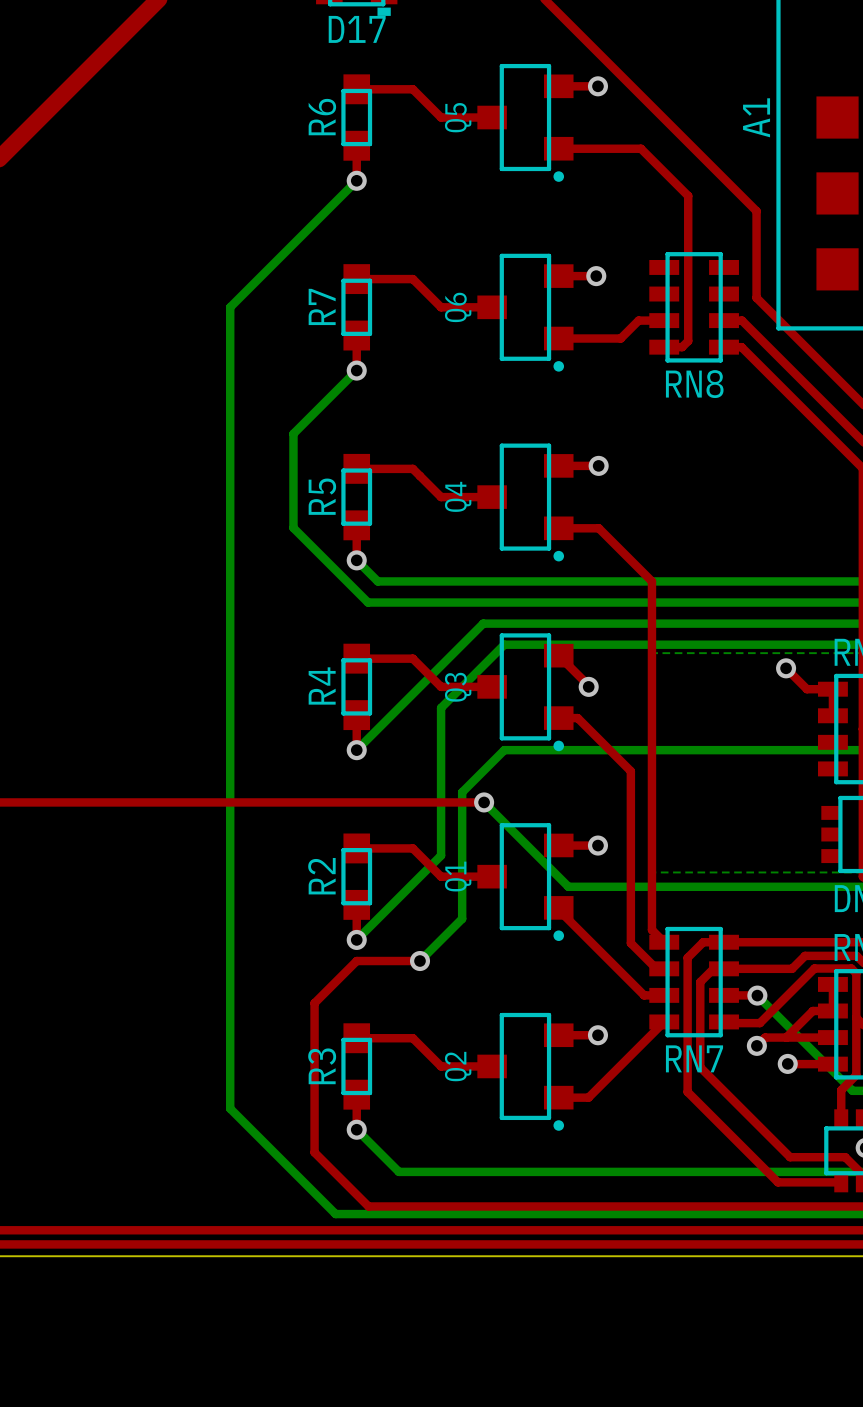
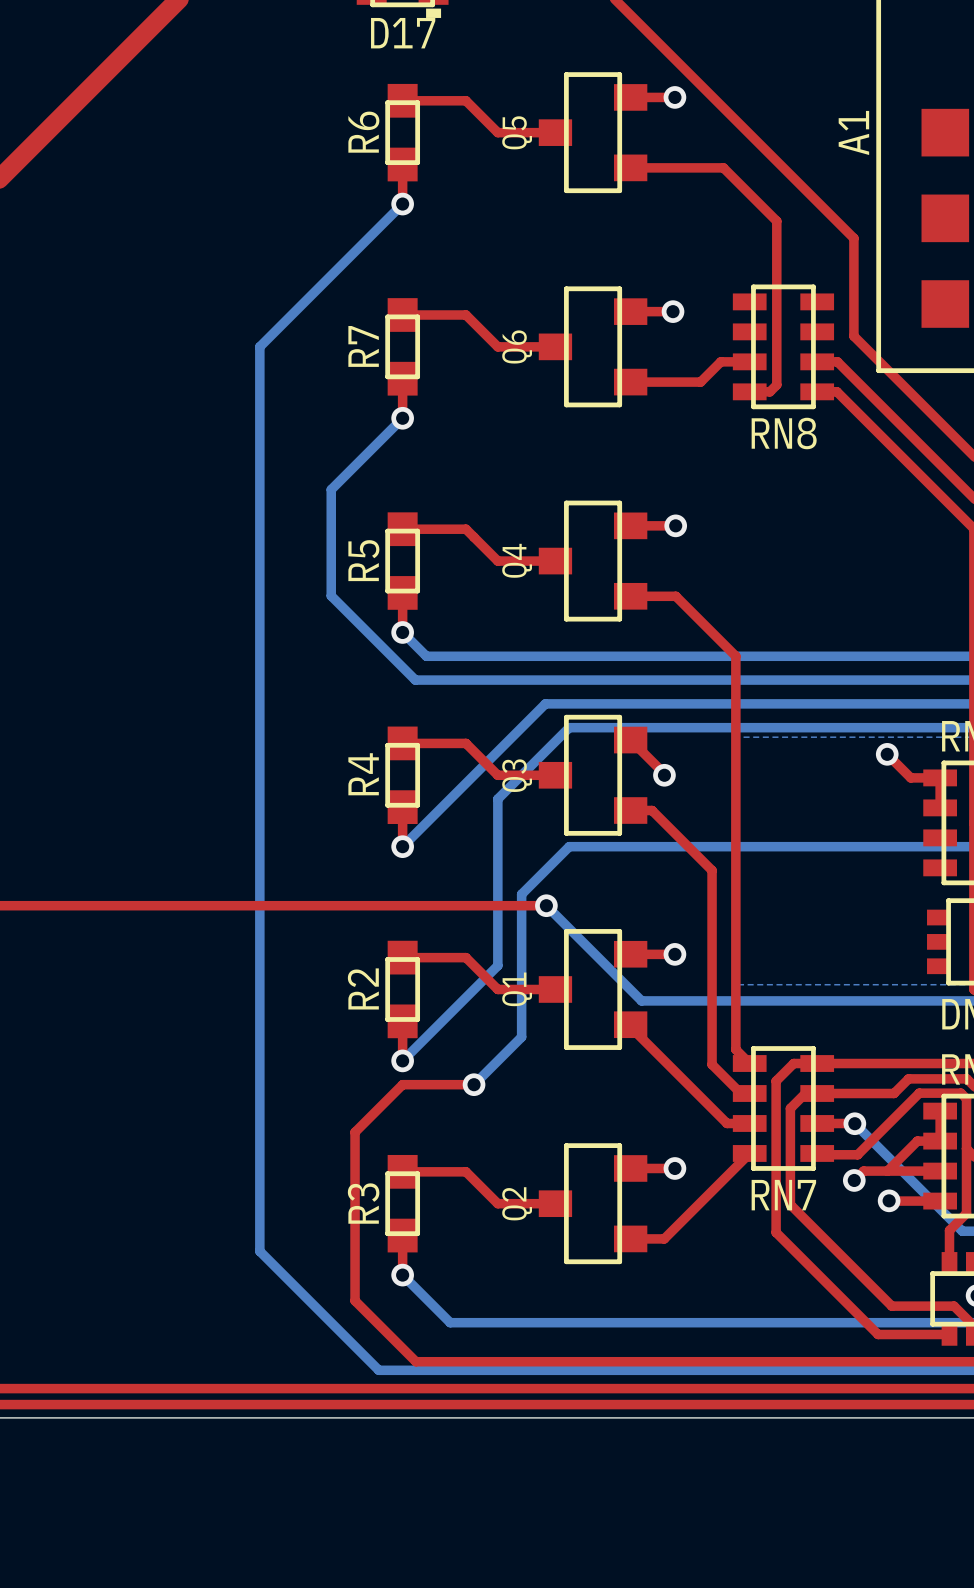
Q5 footprint: [477, 63, 574, 182] -> [538, 72, 648, 194]
Q6 footprint: [477, 253, 574, 372] -> [538, 286, 648, 408]
Q4 footprint: [477, 443, 574, 562] -> [538, 500, 648, 622]
Q3 footprint: [477, 633, 574, 752] -> [538, 714, 648, 836]
Q1 footprint: [477, 823, 574, 941] -> [538, 929, 648, 1050]
Q2 footprint: [477, 1012, 574, 1131] -> [538, 1143, 648, 1265]

